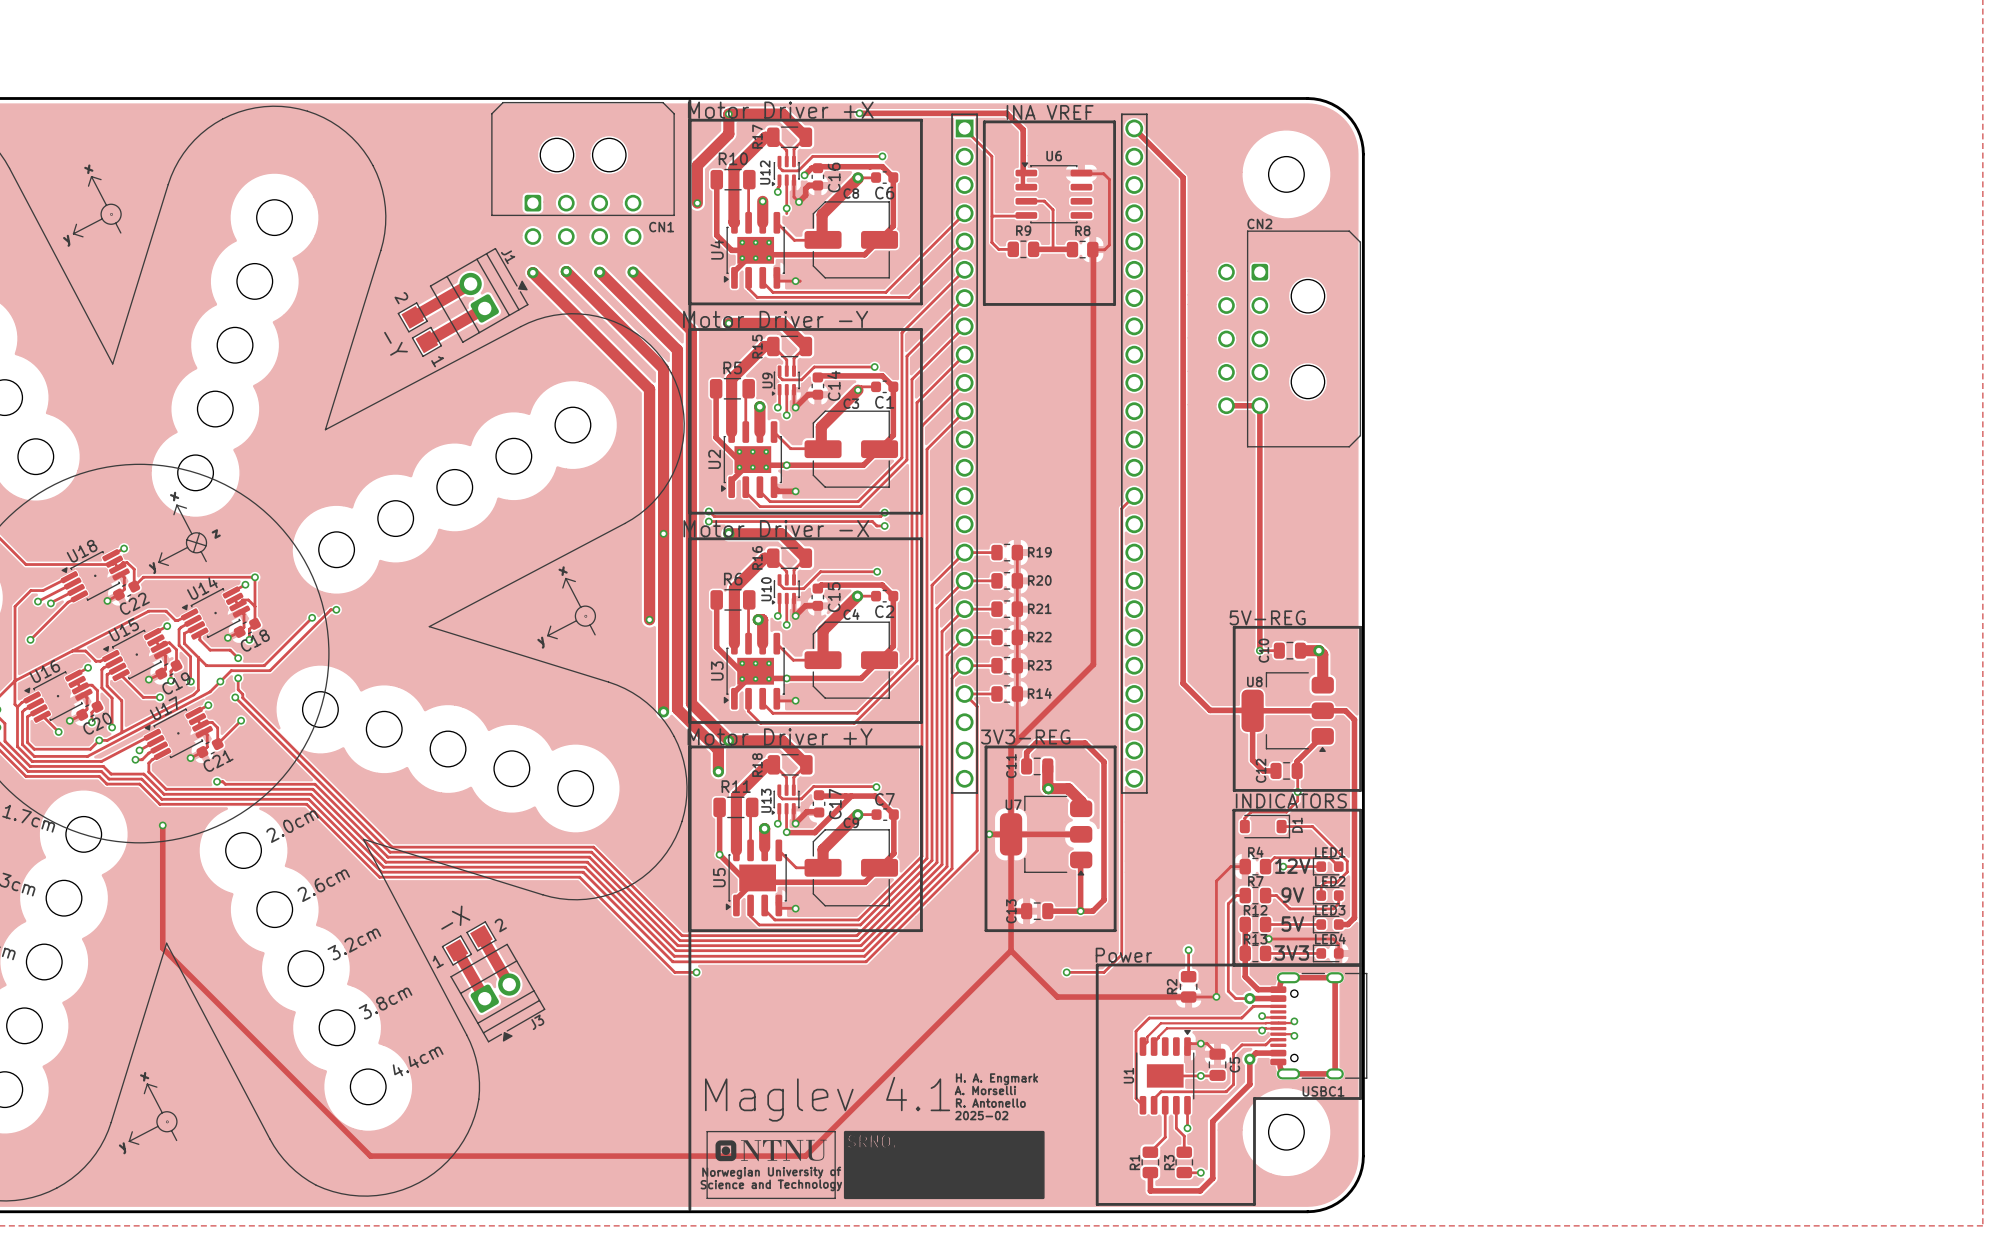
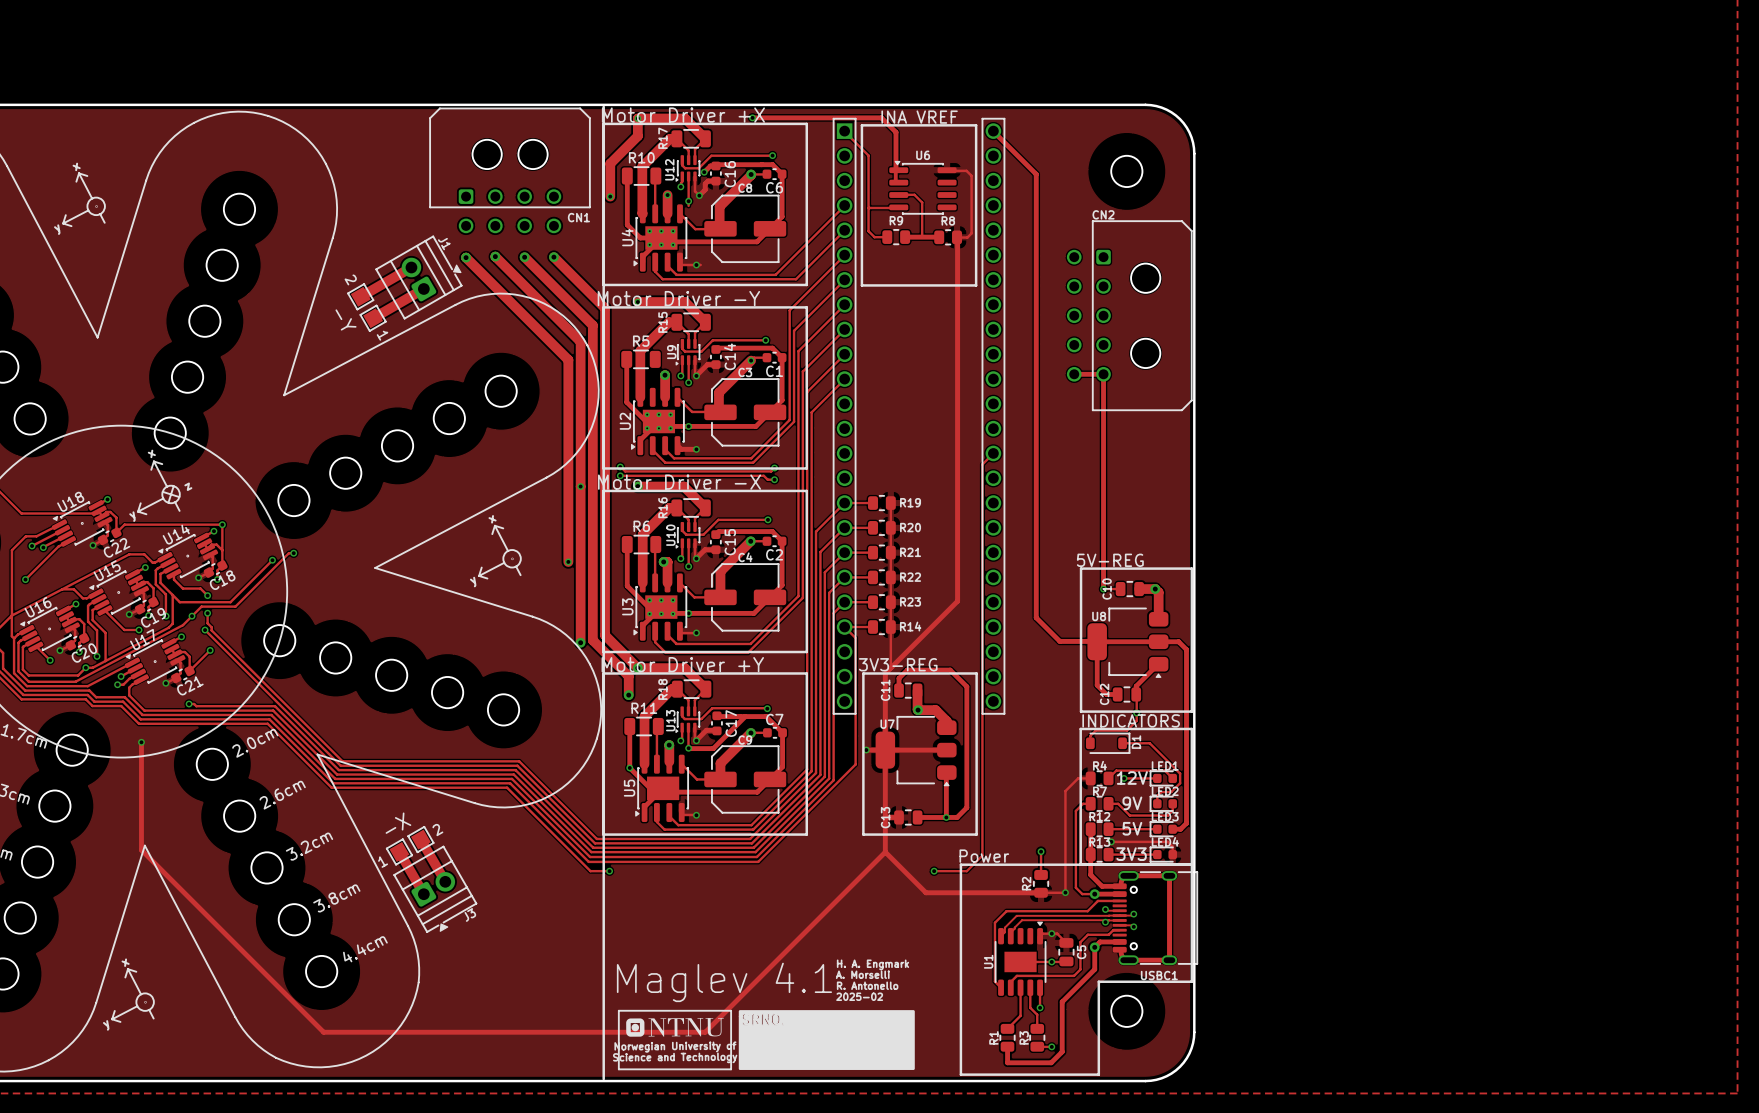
track: (748, 388) (745, 391) (745, 432) -> none

